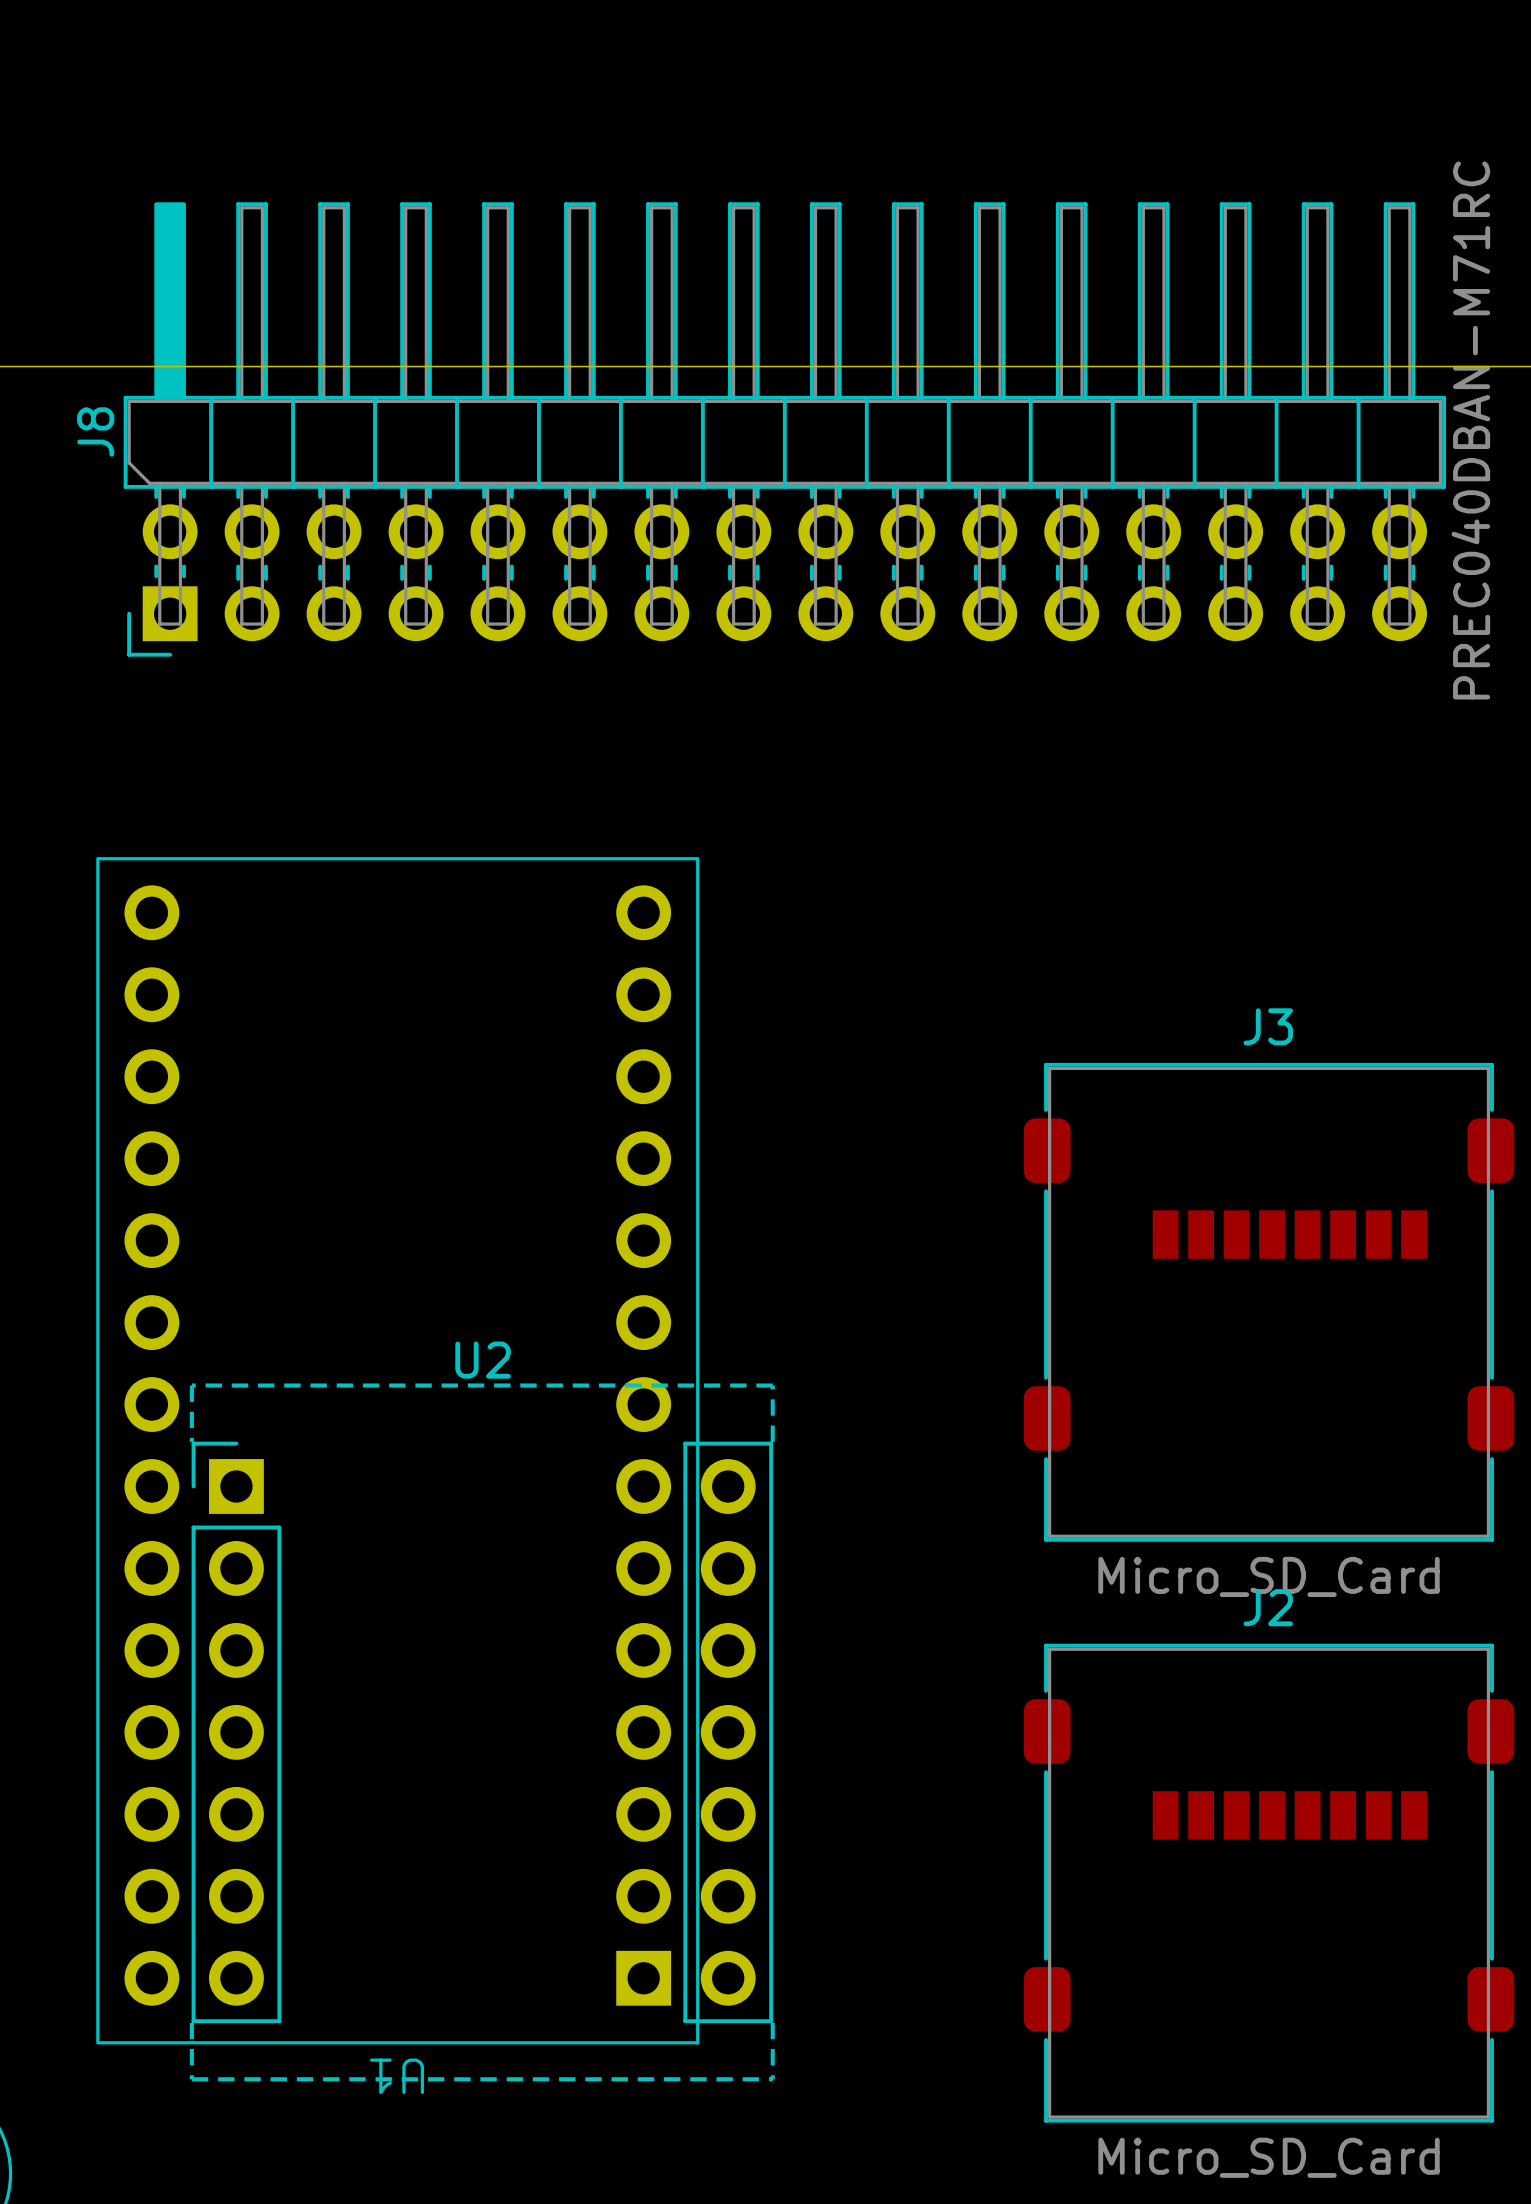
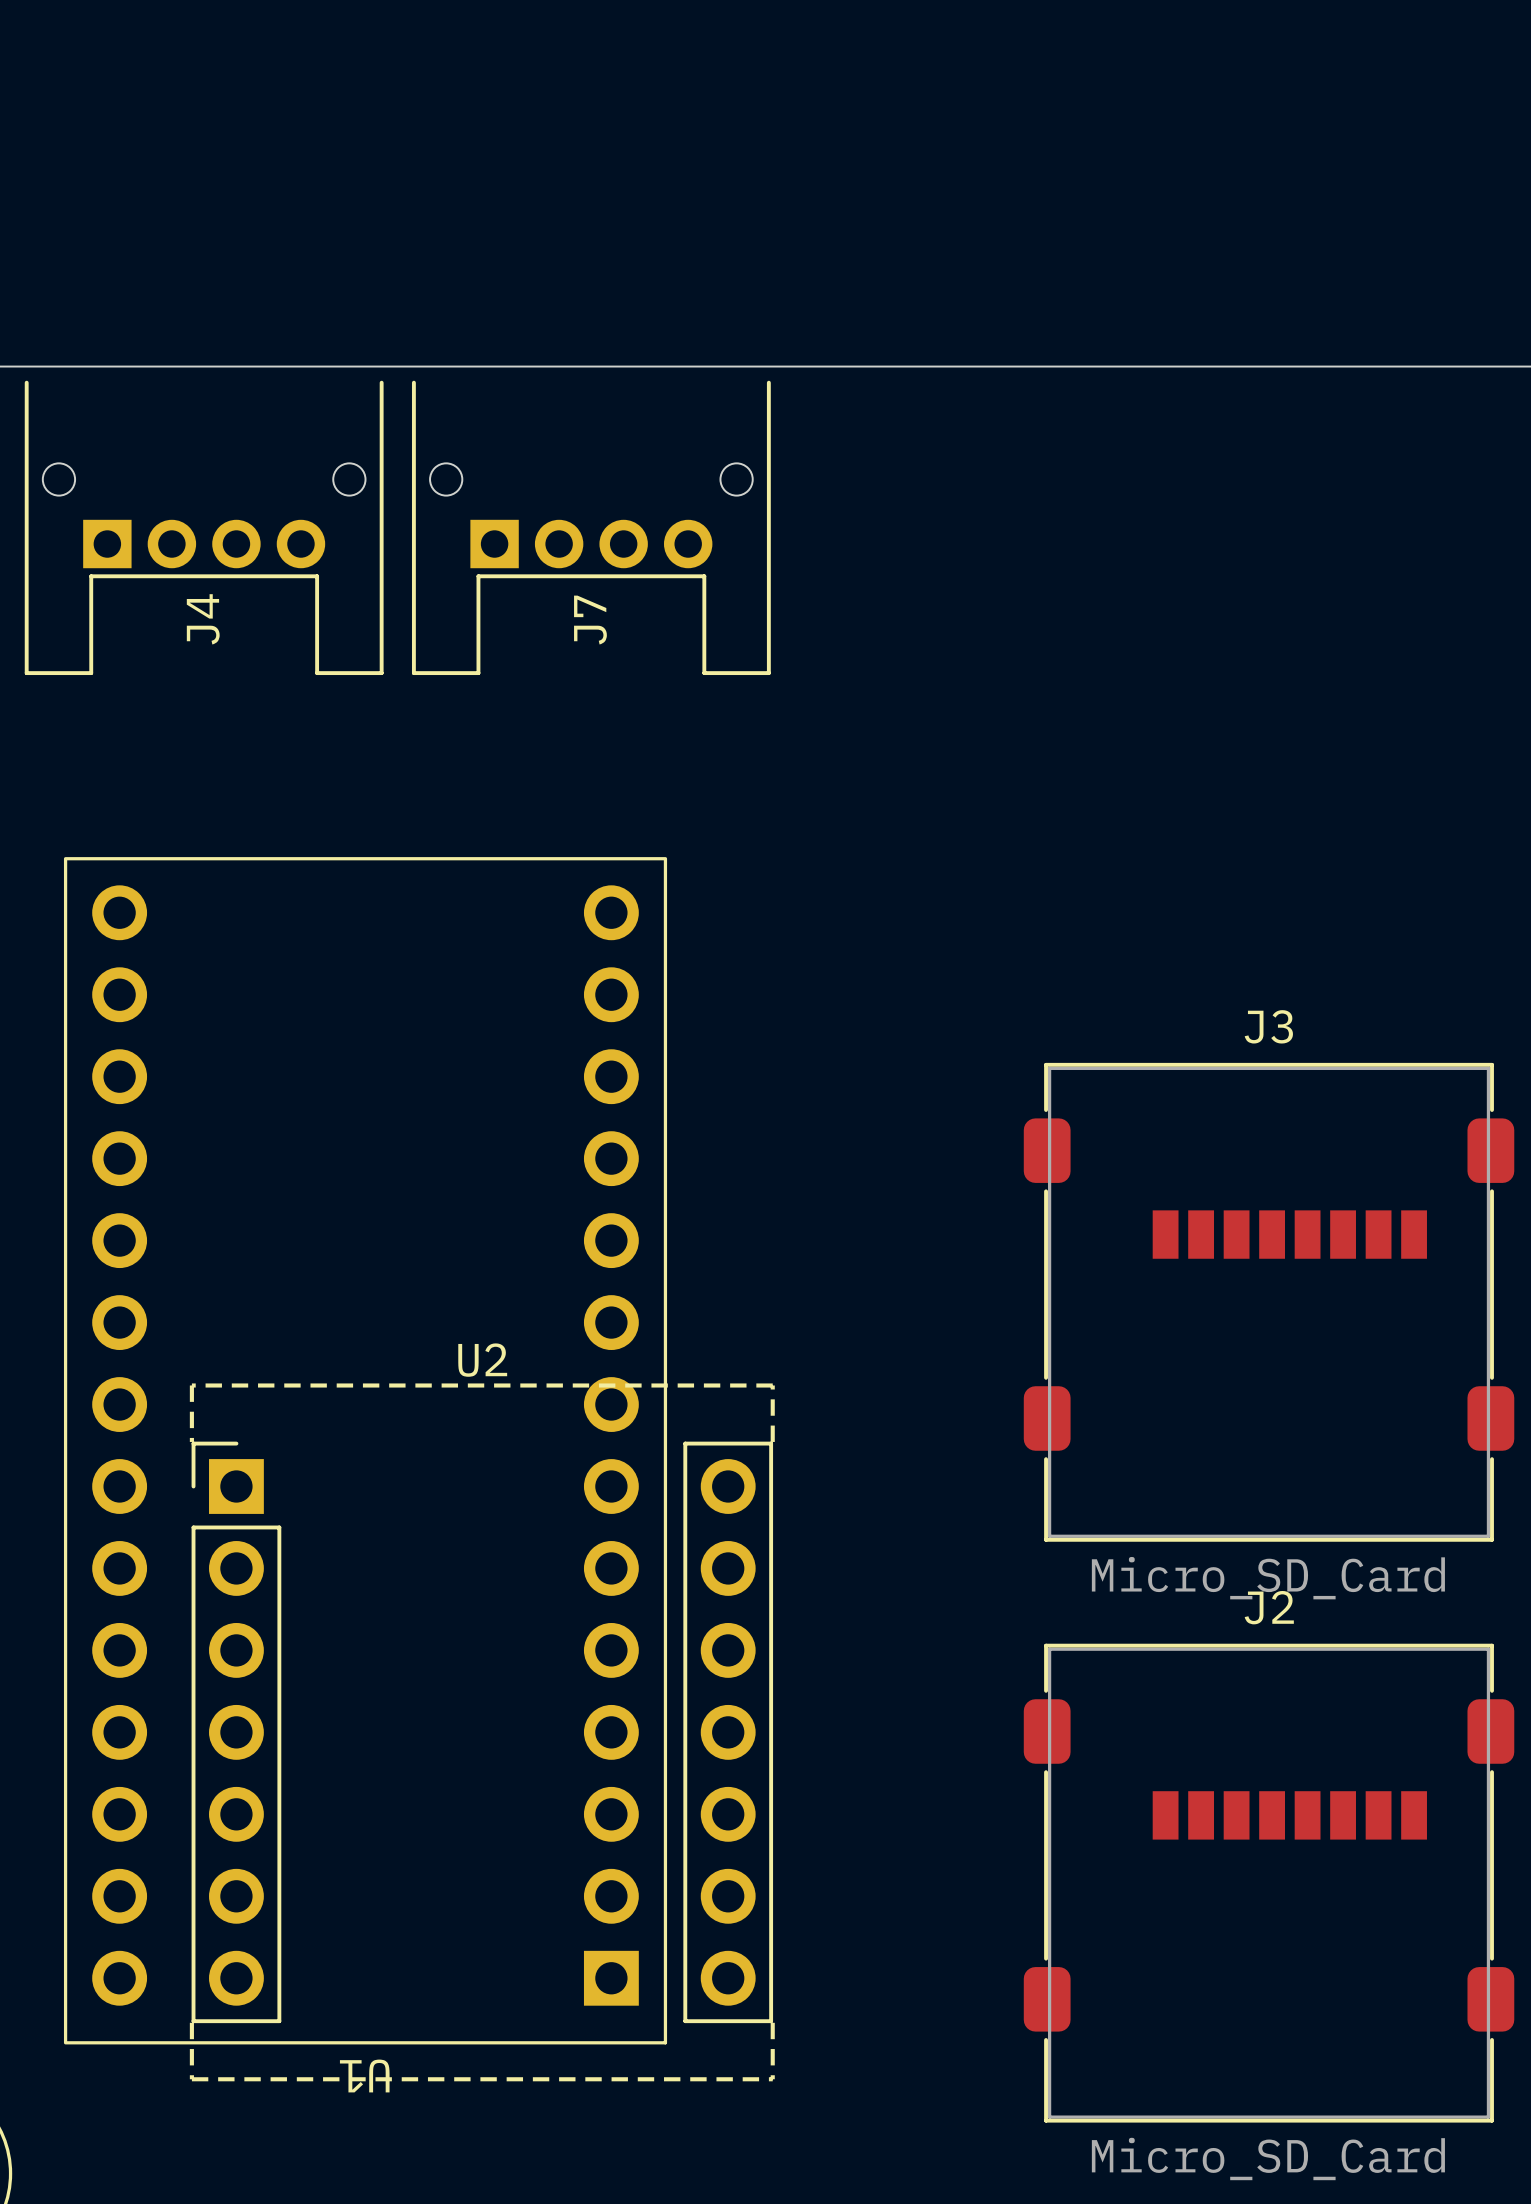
J8: PREC040DBAN-M71RC (784, 429) -> none
J4: none -> (204, 527)
J7: none -> (591, 527)
U1 position: (397, 1450) -> (365, 1450)

